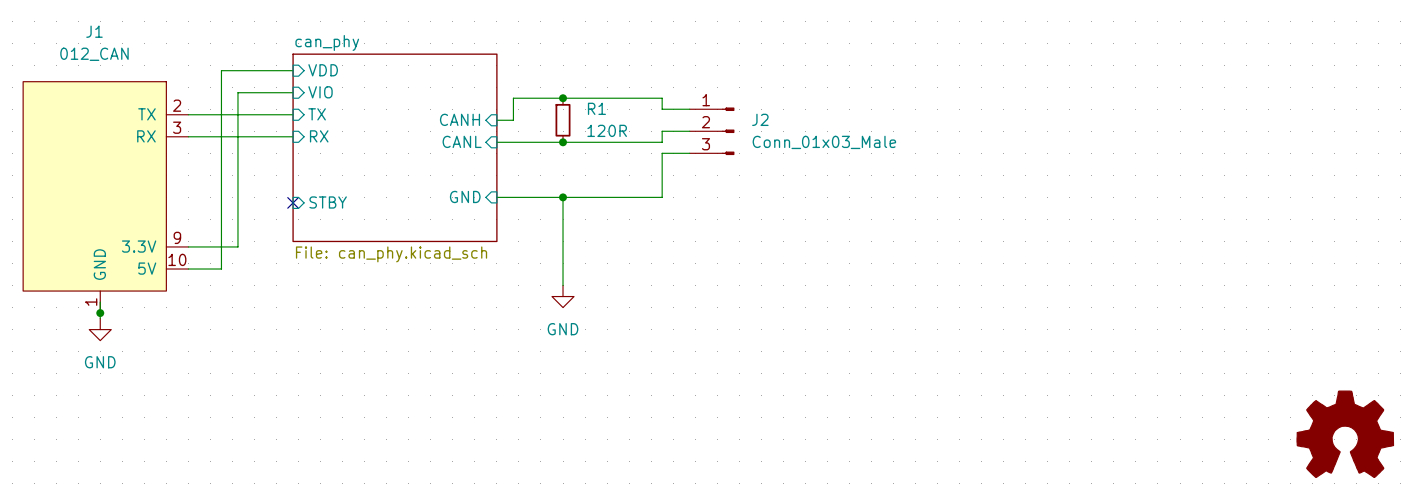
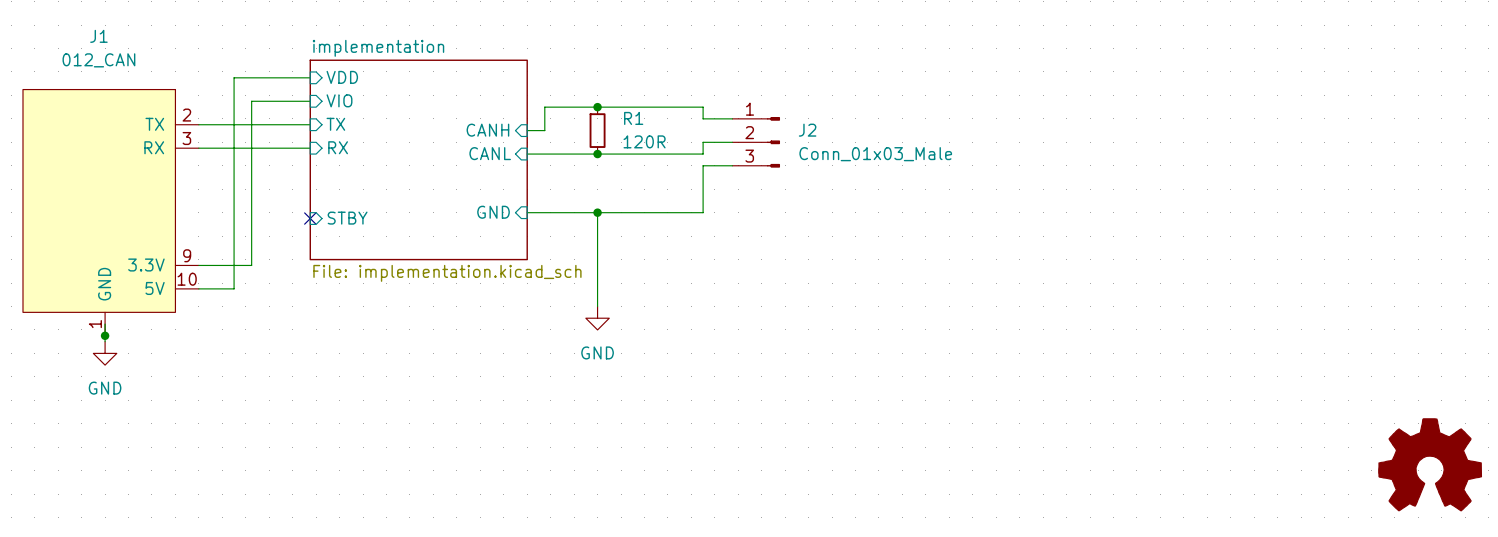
sheet can_phy name: can_phy (327, 42) -> implementation (378, 48)
sheet can_phy value: File: can_phy.kicad_sch (391, 254) -> File: implementation.kicad_sch (447, 273)

